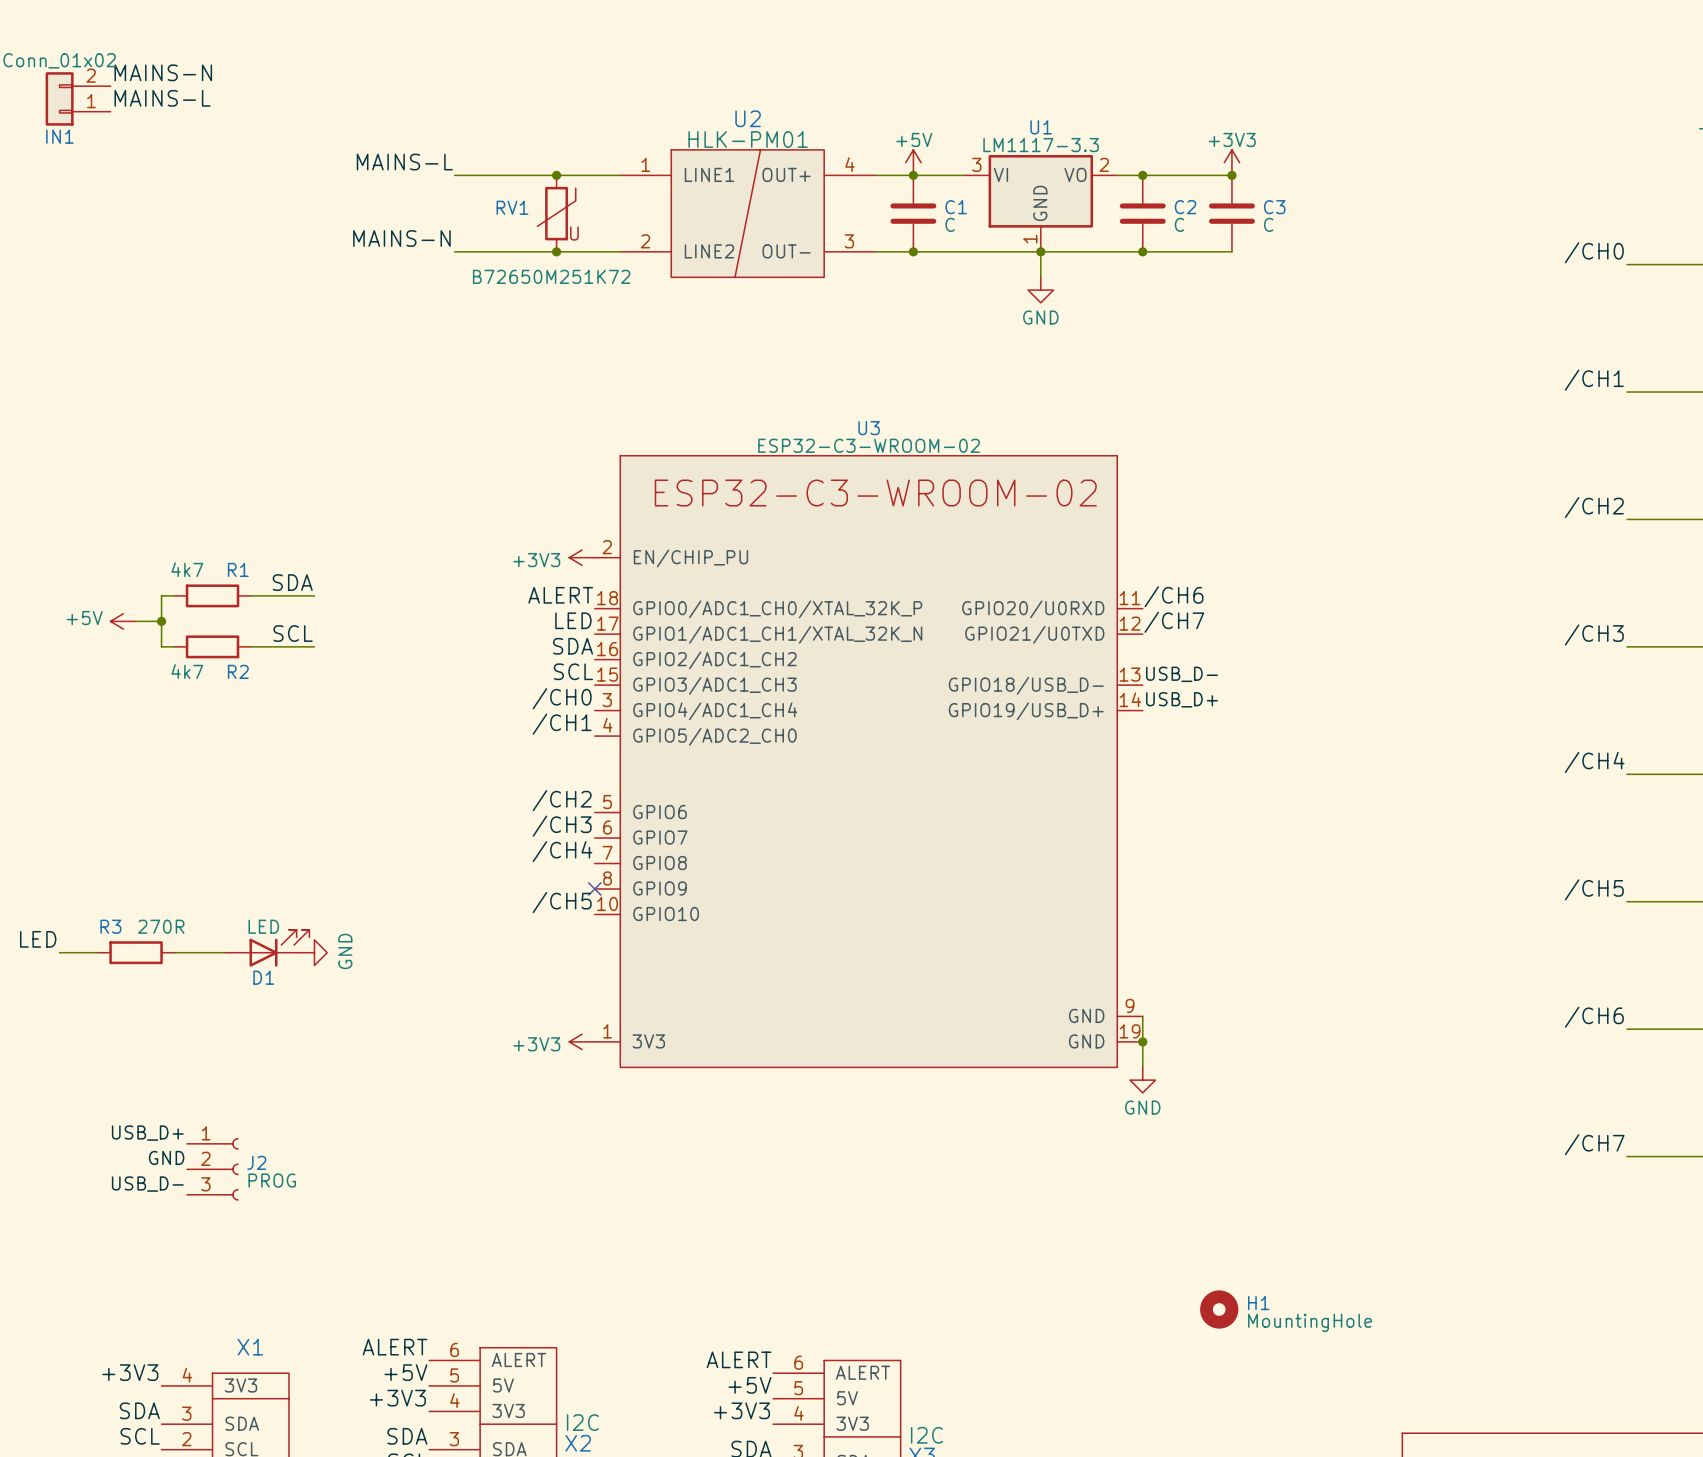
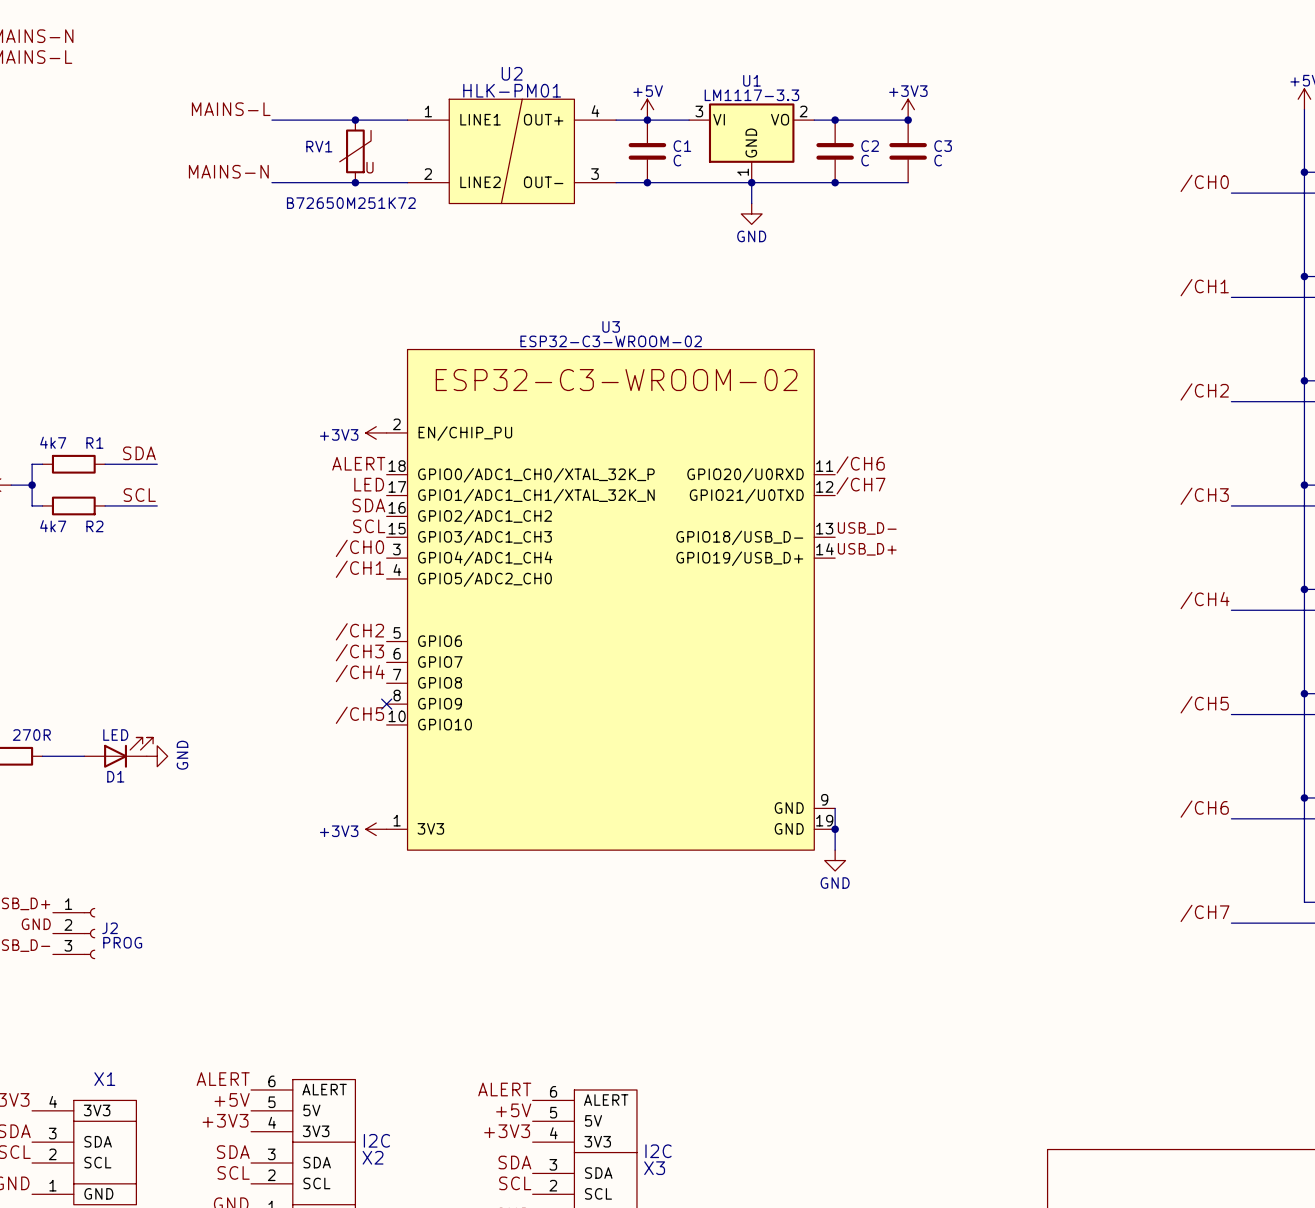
H1: MountingHole (1219, 1309) -> none

